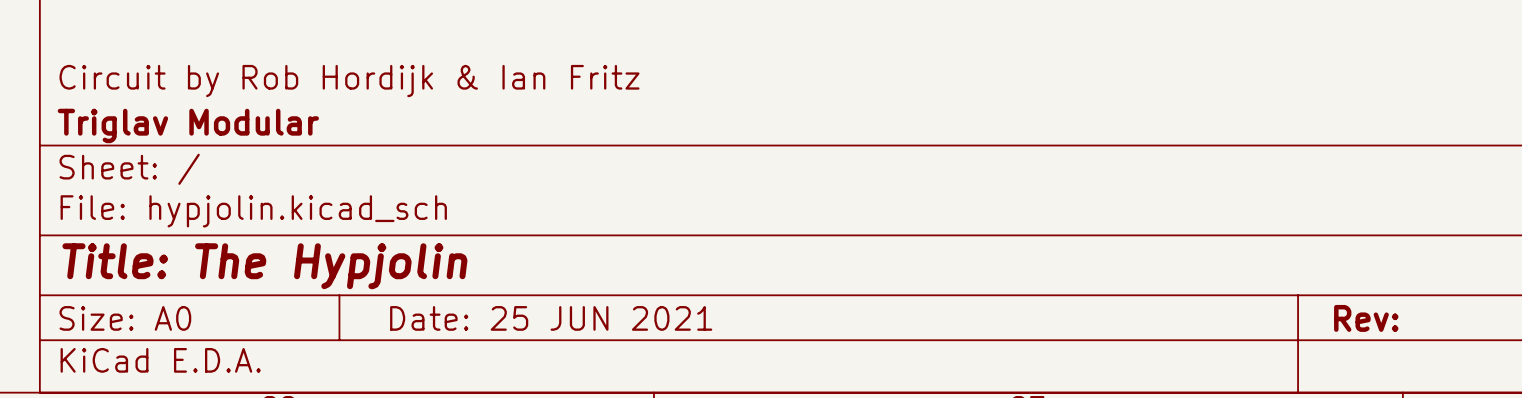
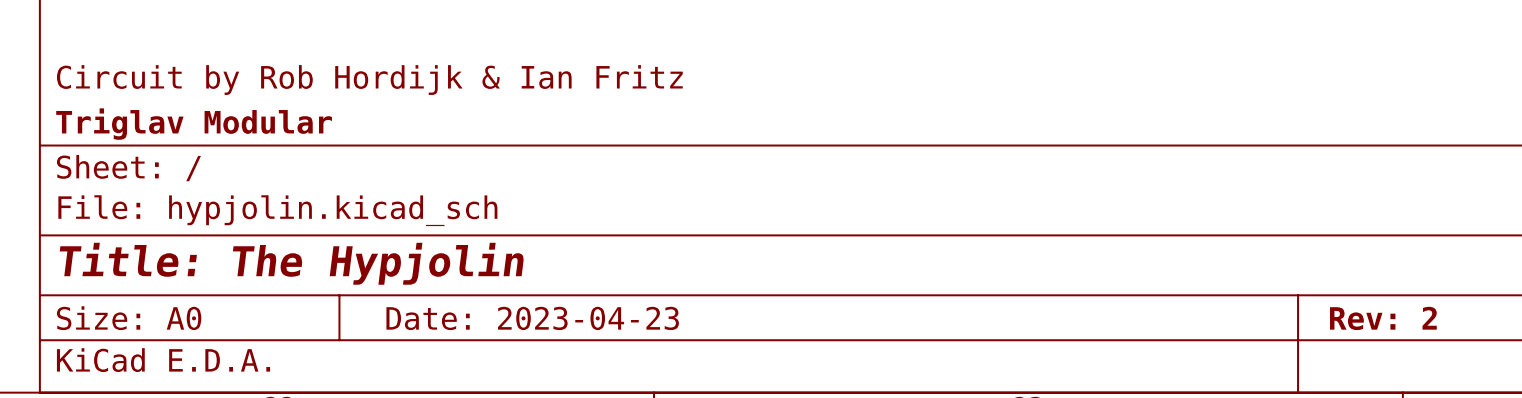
title block: Date: 25 JUN 2021 (551, 318) -> Date: 2023-04-23 (532, 318)
title block: Rev: (1366, 318) -> Rev: 2 (1383, 318)

